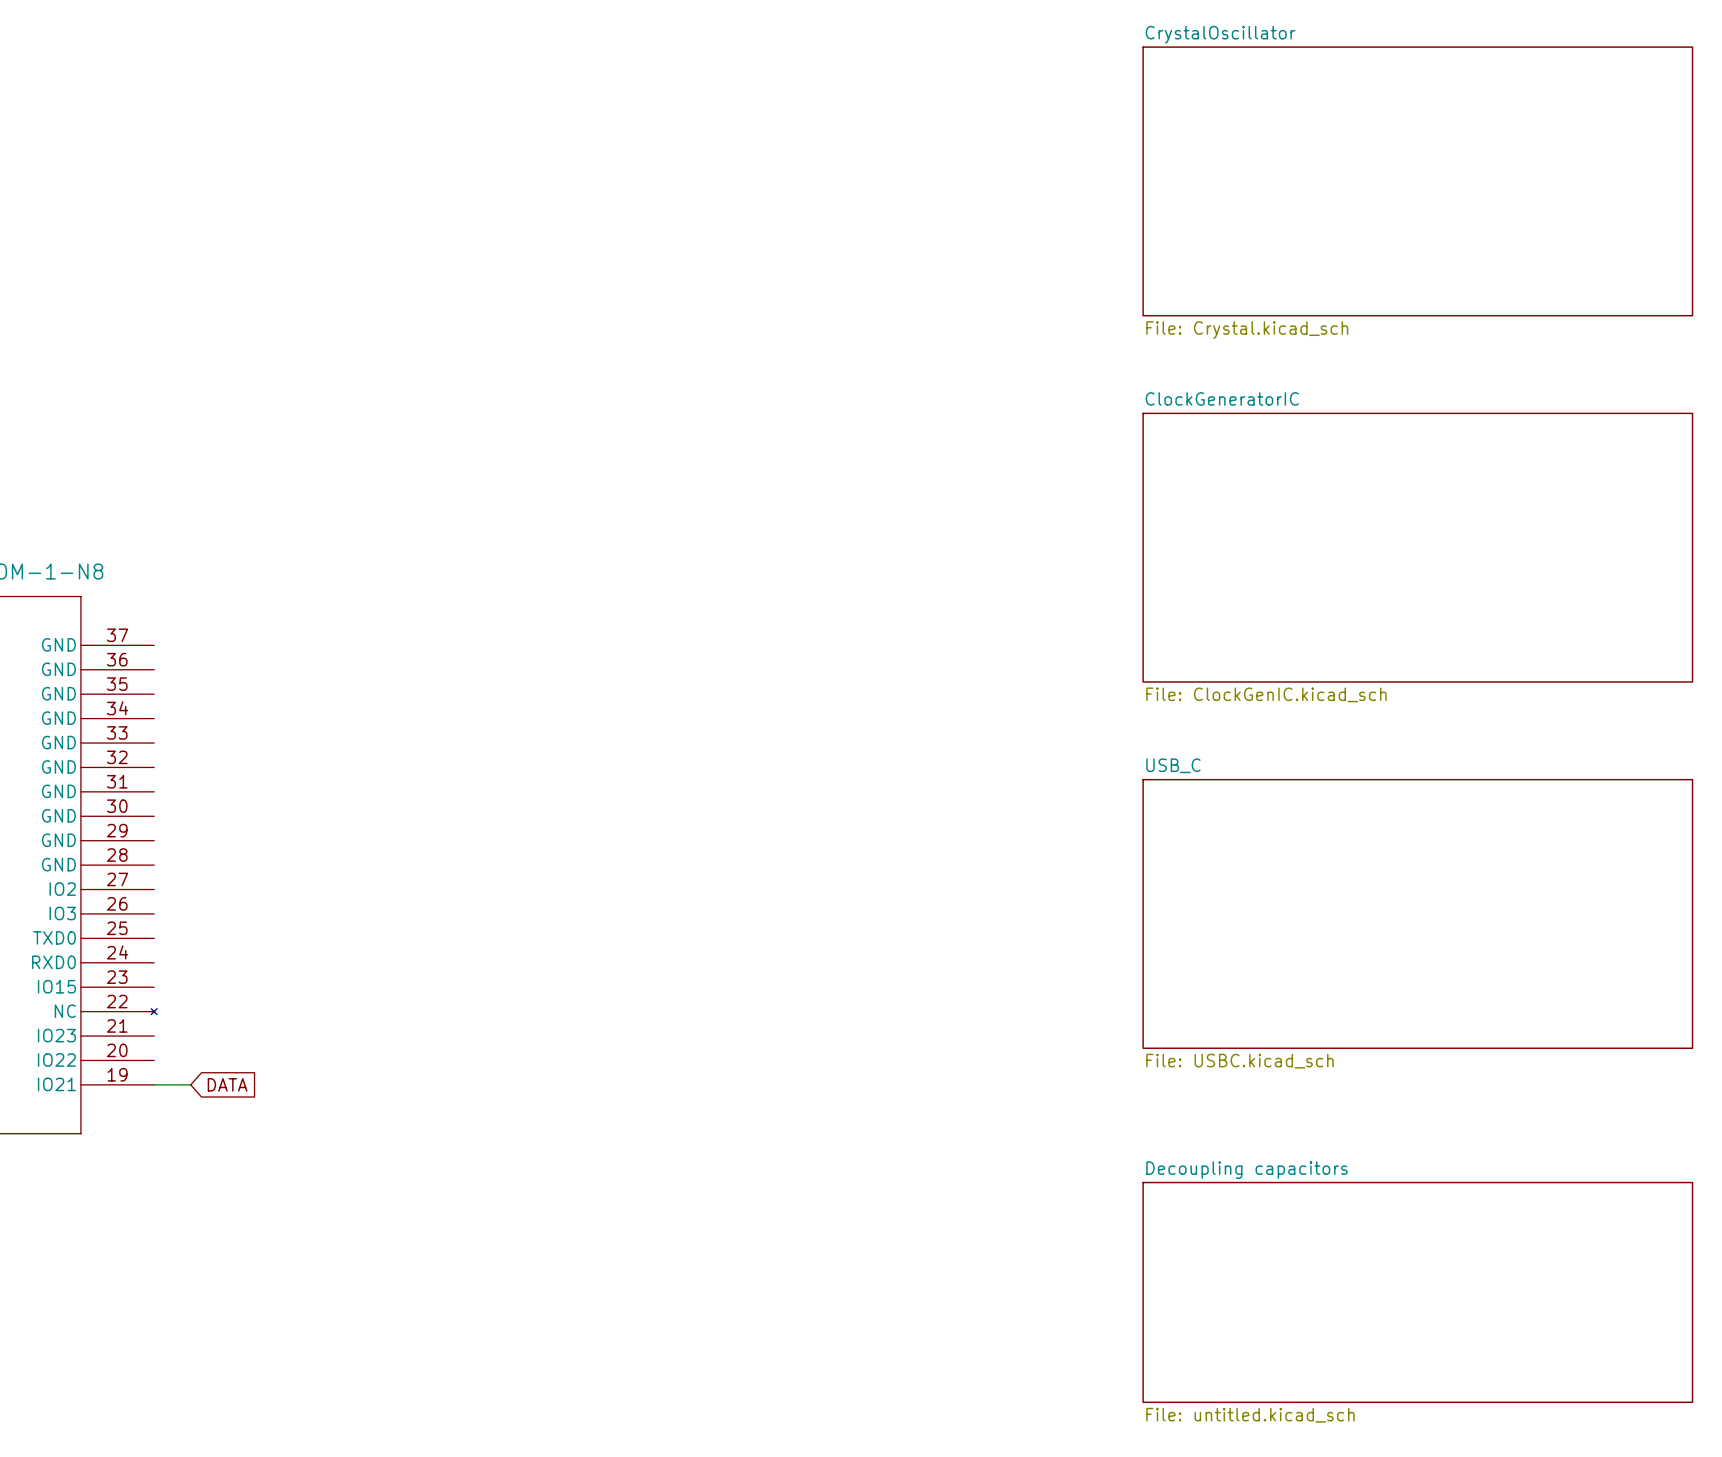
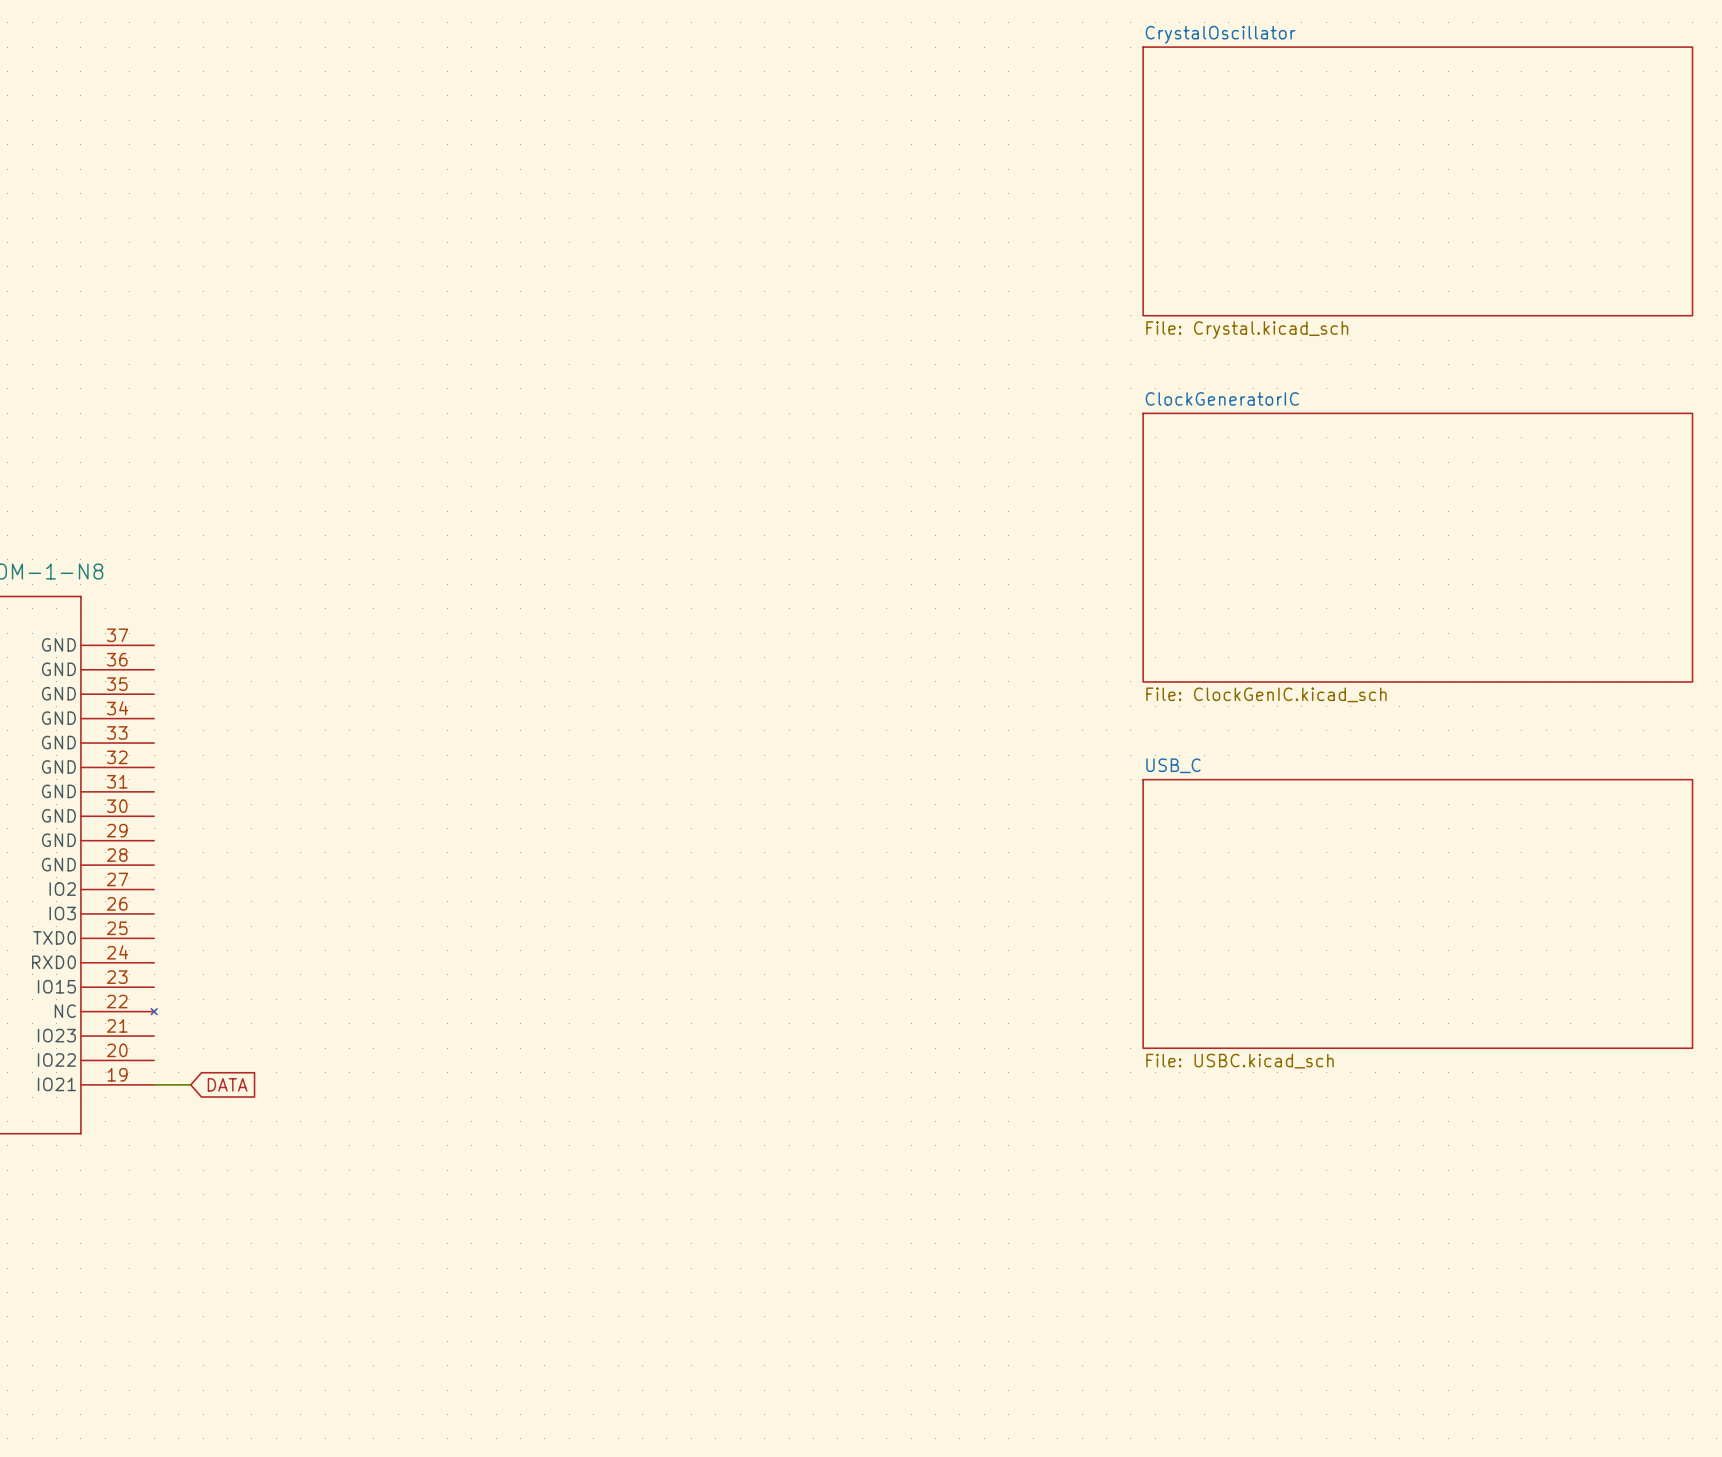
sheet Decoupling capacitors: File: untitled.kicad_sch (1417, 1292) -> none

